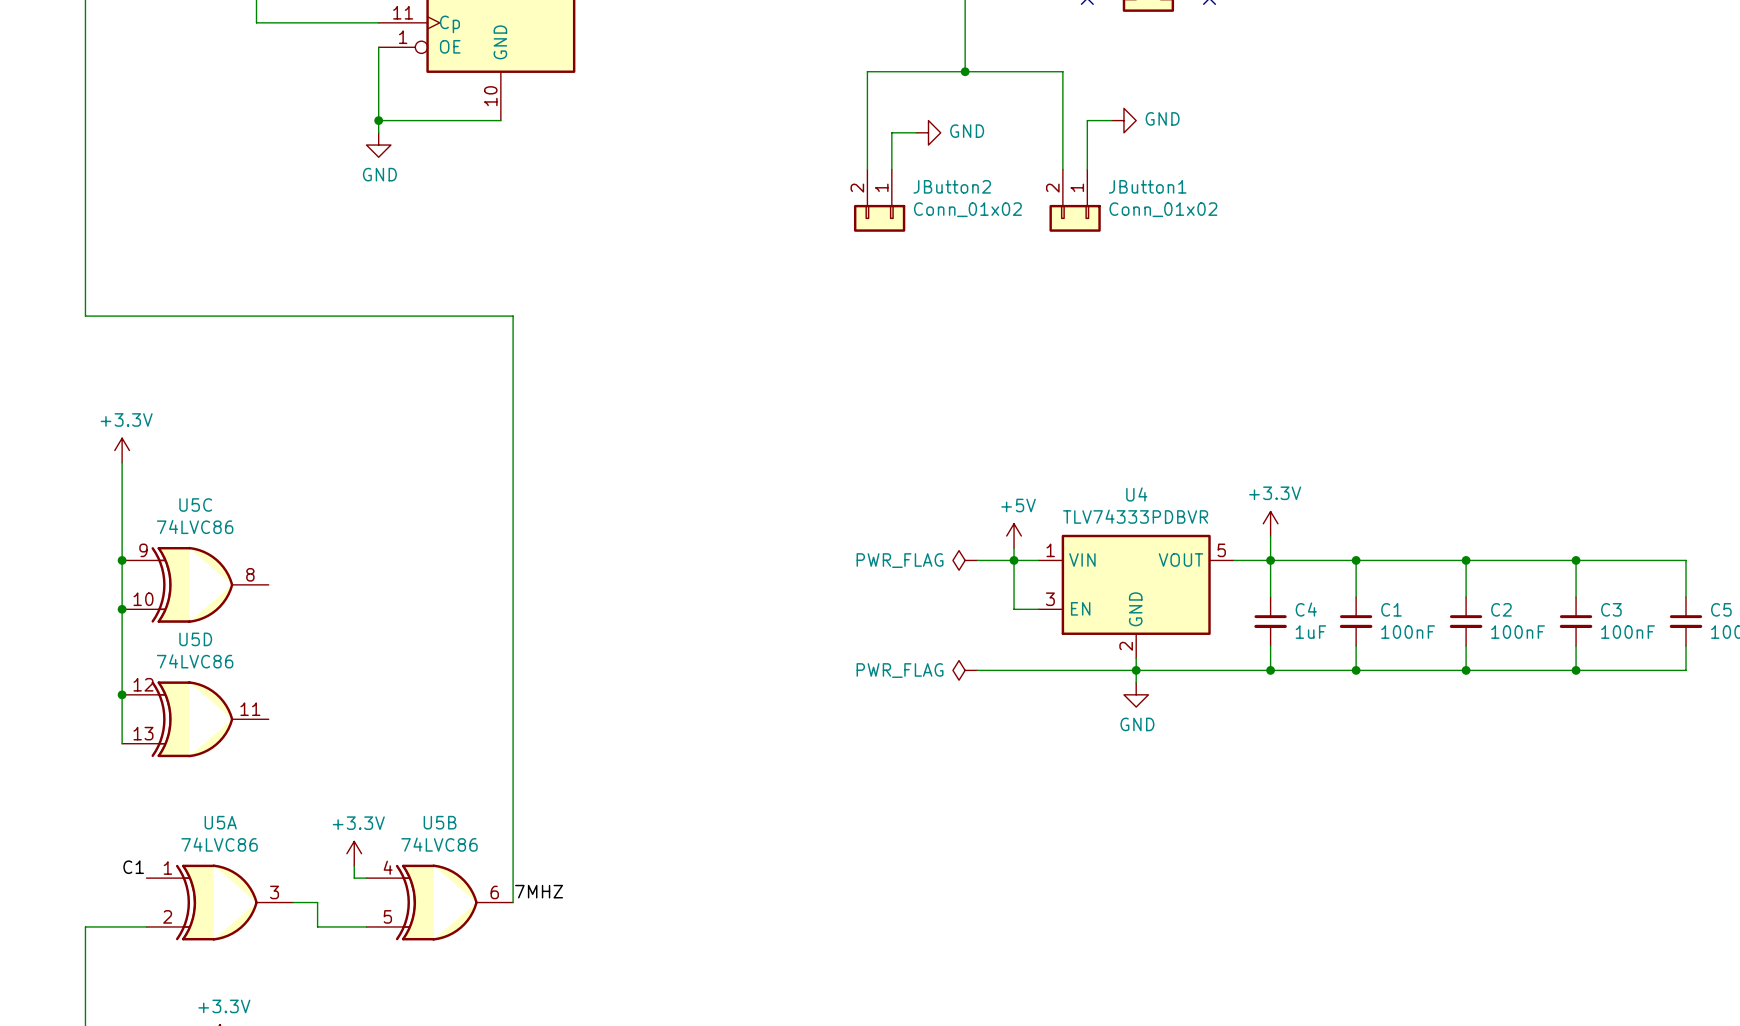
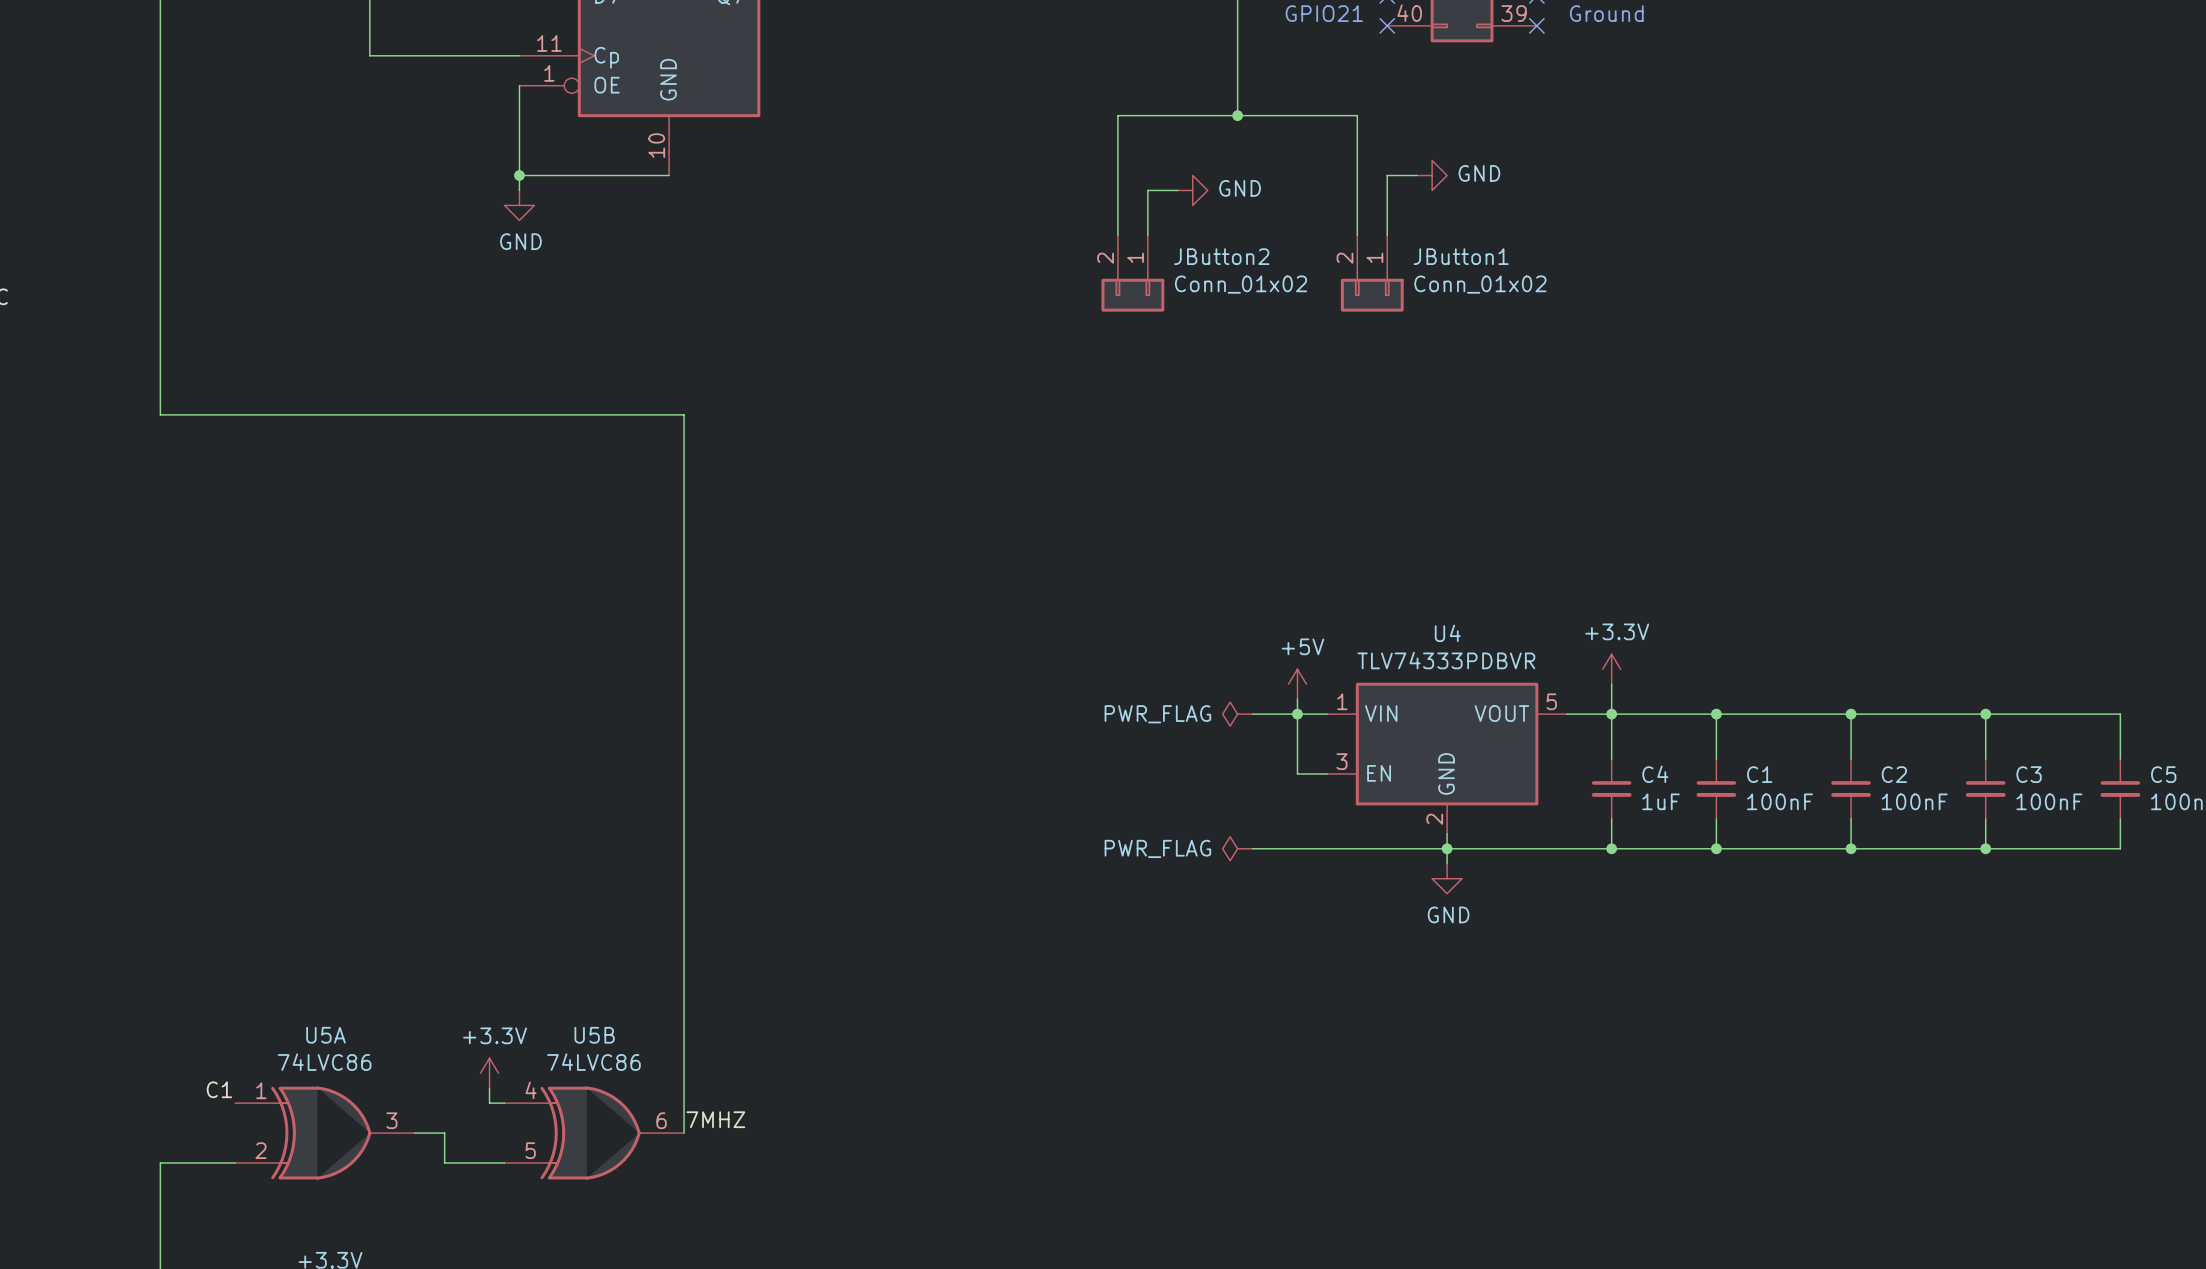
power symbol: +3.3V (122, 450) -> none
wire: (122, 462) (122, 743) -> none
junction: (122, 560) -> none
U5C: 74LVC86 (195, 584) -> none
junction: (122, 609) -> none
junction: (122, 694) -> none
U5D: 74LVC86 (195, 719) -> none

